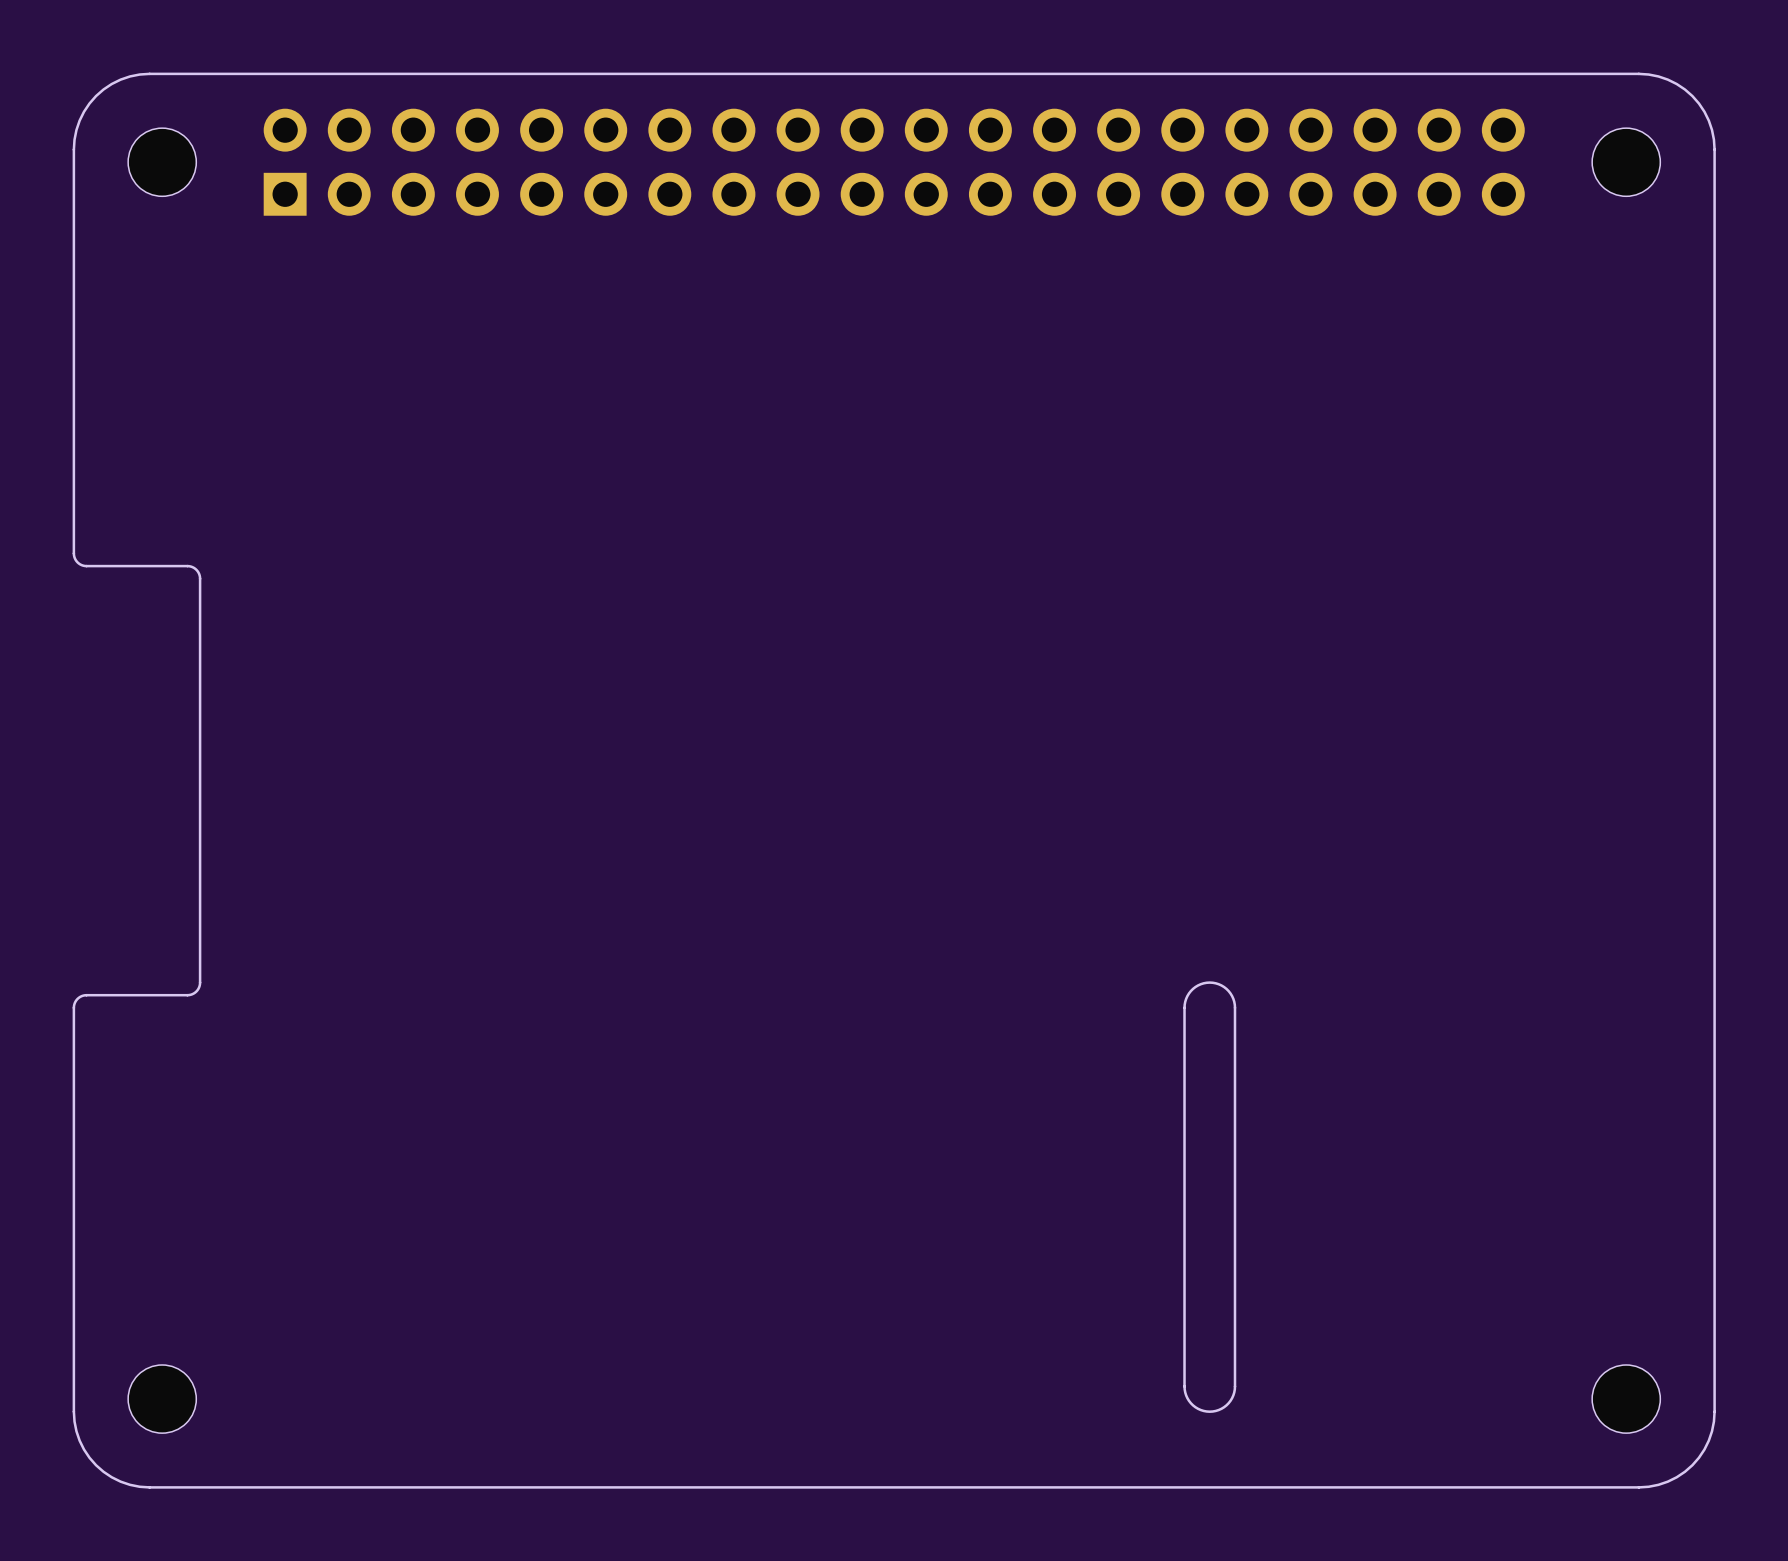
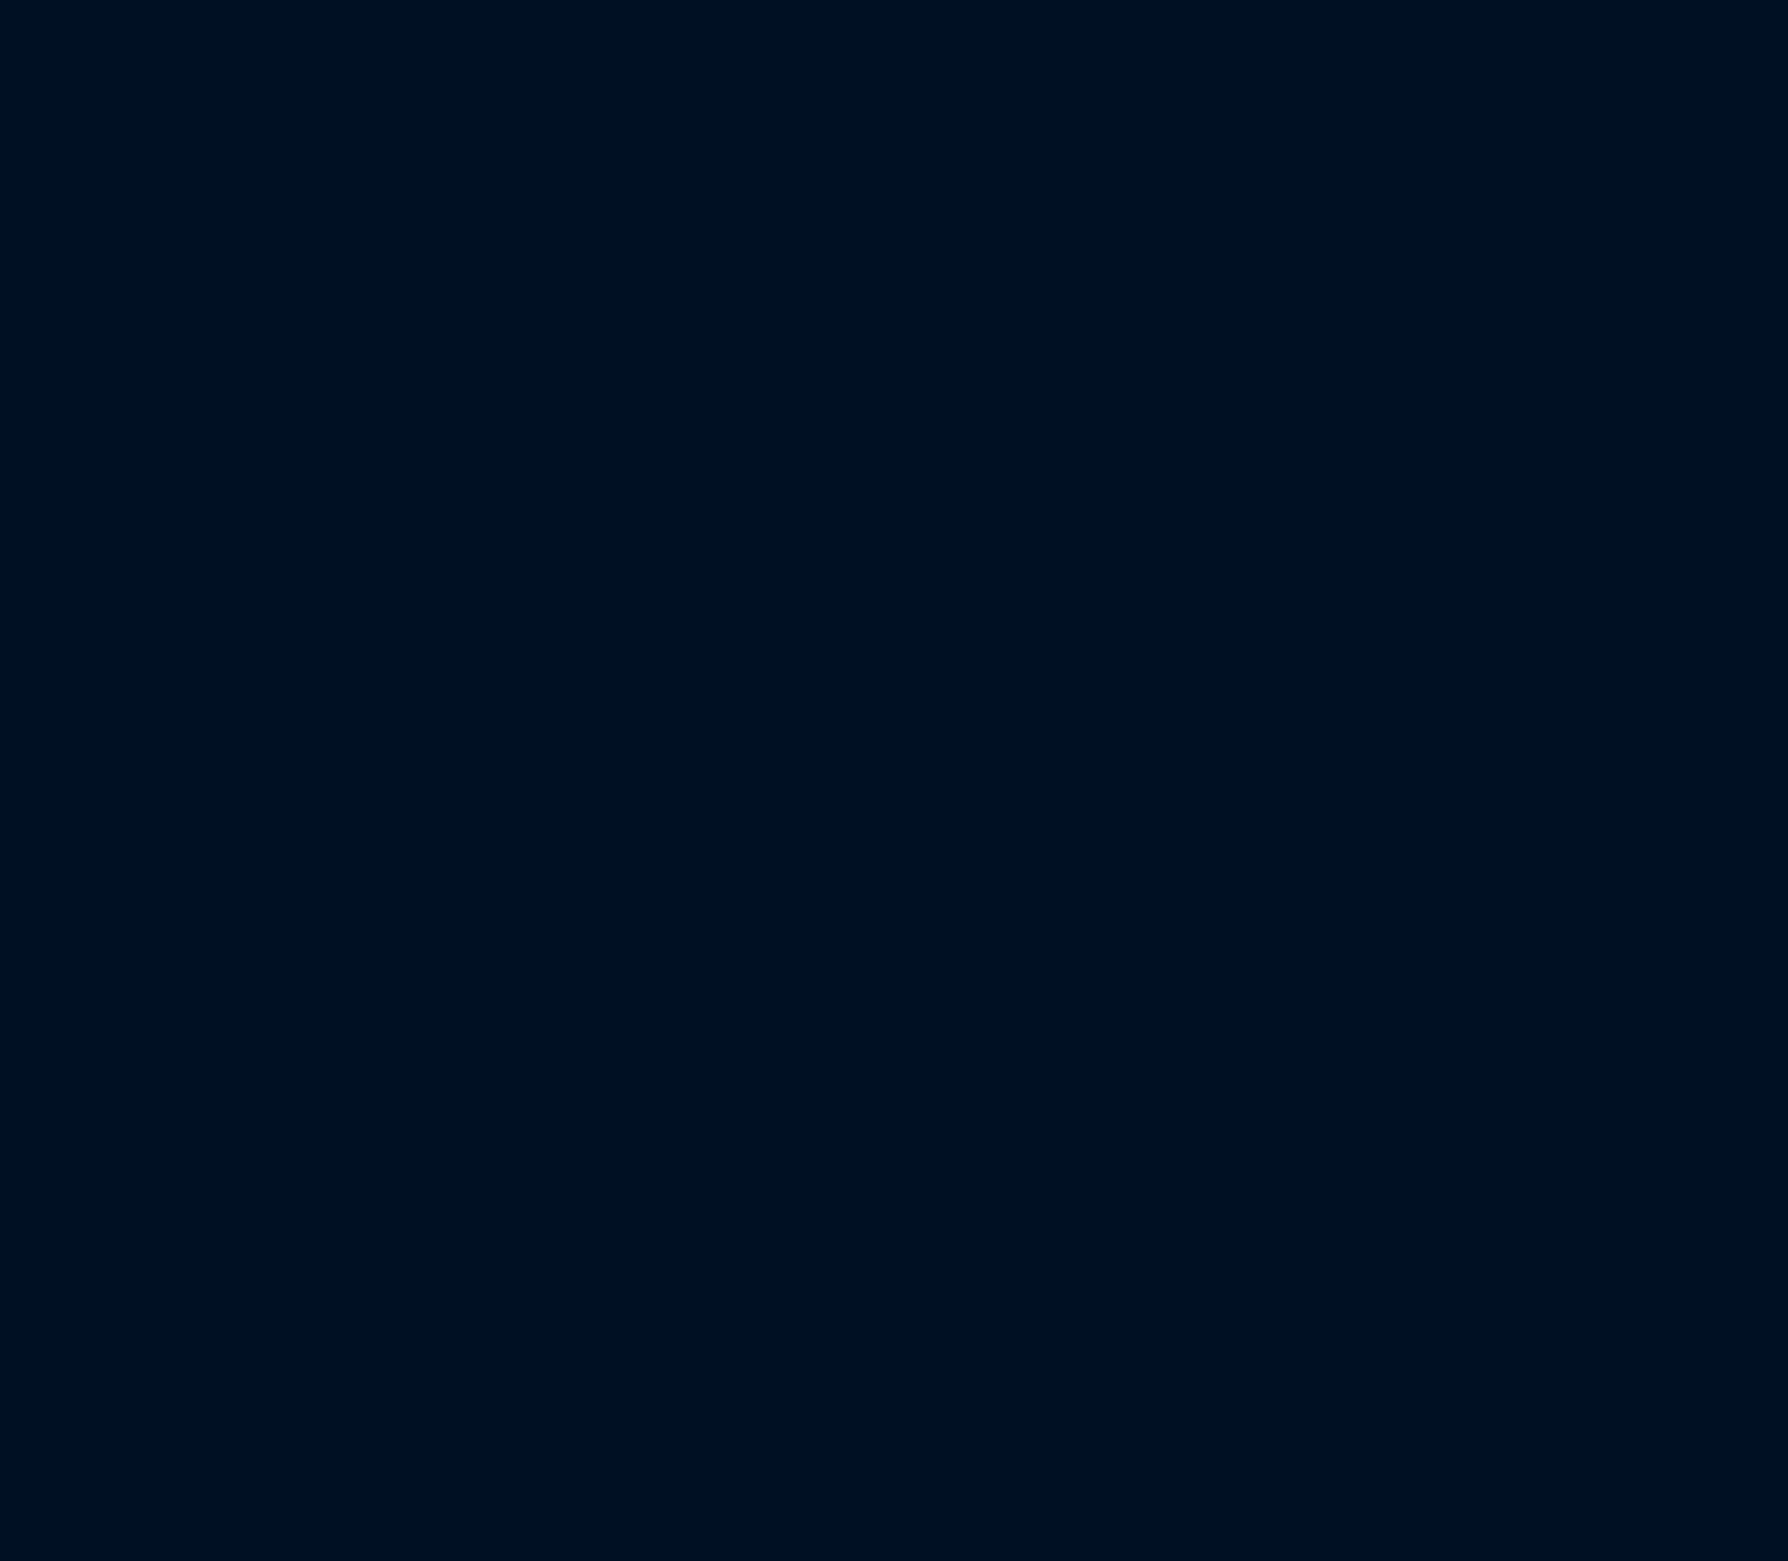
board edge: (149, 73) (1638, 73) (1667, 79) (1692, 96) (1708, 120) (1714, 149) (1714, 1411) (1708, 1440) (1692, 1465) (1667, 1481) (1638, 1487) (149, 1487) (120, 1481) (96, 1465) (79, 1440) (73, 1411) (74, 1004) (78, 997) (84, 995) (189, 995) (196, 991) (200, 982) (199, 575) (195, 568) (189, 566) (84, 565) (77, 562) (73, 553) (74, 139) (84, 111) (103, 89) (130, 76) (149, 73) -> none
part: (162, 162) -> none
part: (894, 162) -> none
part: (1626, 162) -> none
board edge: (1184, 1007) (1184, 1389) (1188, 1400) (1195, 1407) (1203, 1410) (1212, 1411) (1221, 1408) (1228, 1403) (1233, 1395) (1234, 1386) (1234, 1004) (1232, 996) (1226, 988) (1218, 984) (1209, 982) (1198, 985) (1190, 991) (1186, 998) (1184, 1007) -> none
part: (162, 1399) -> none
part: (1626, 1399) -> none

